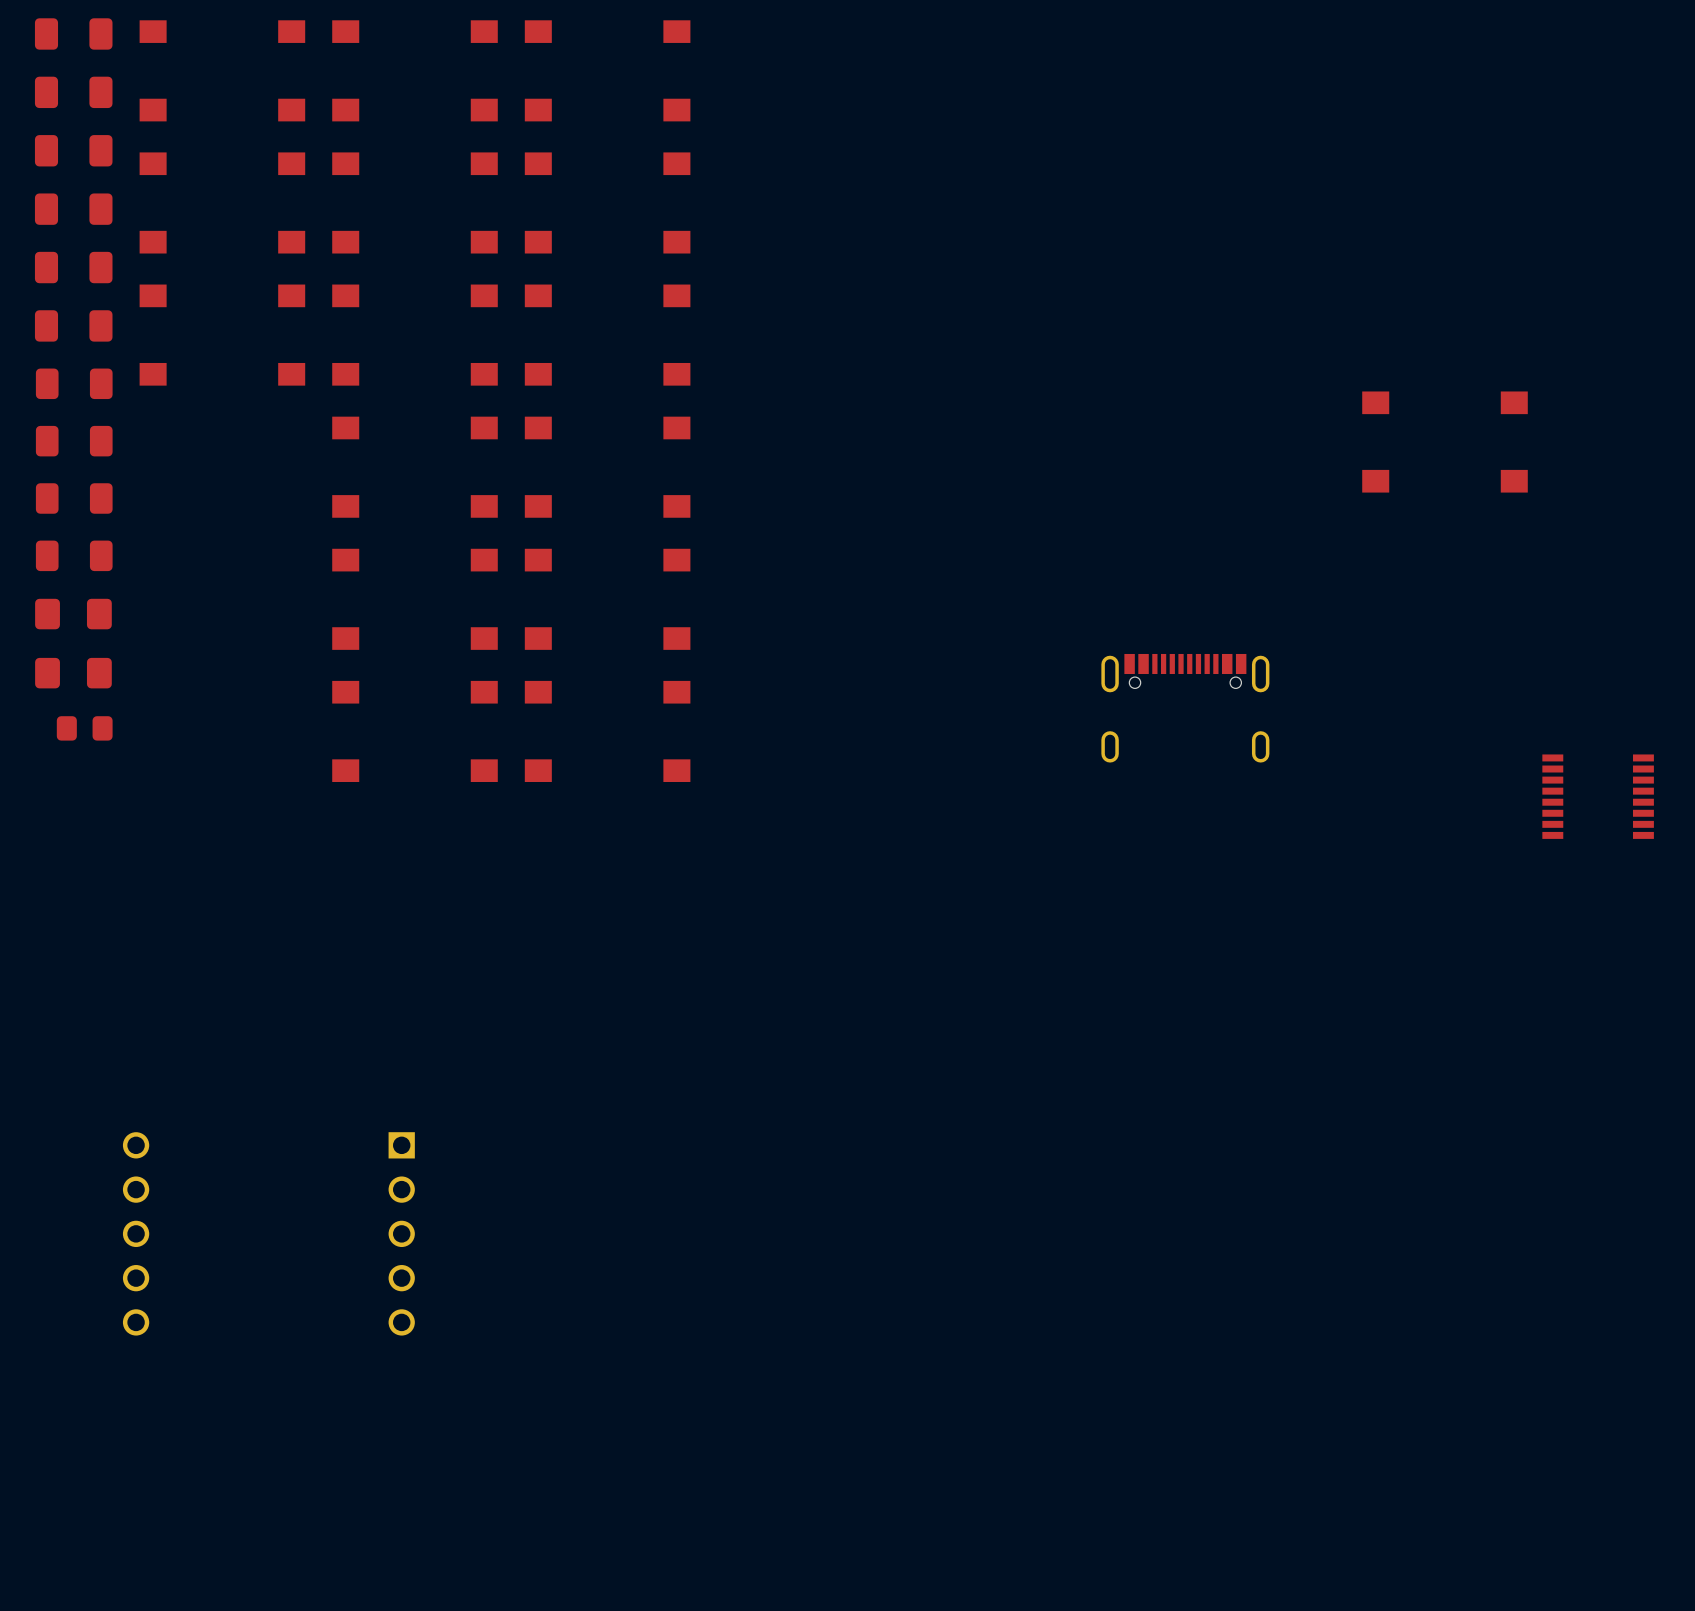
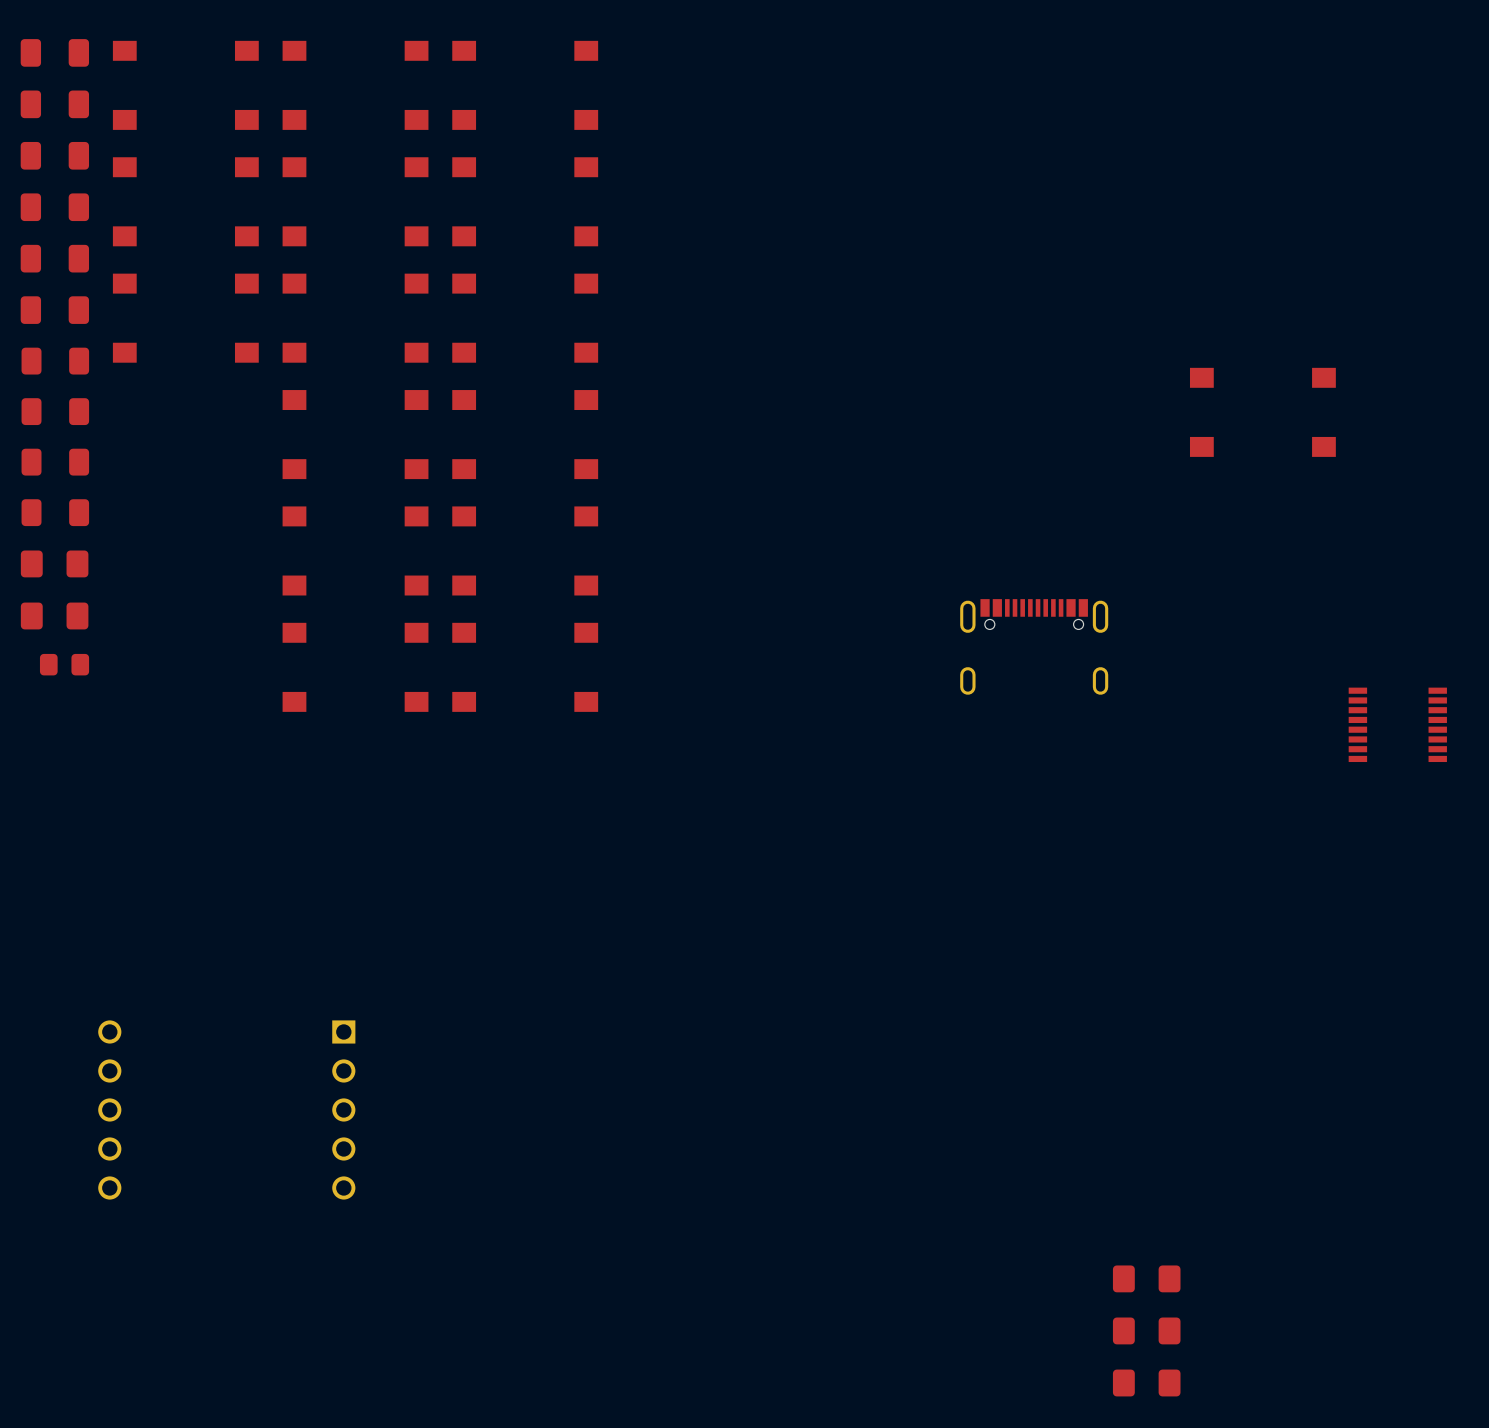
part: none -> (1146, 1278)
part: none -> (1146, 1330)
part: none -> (1146, 1383)

